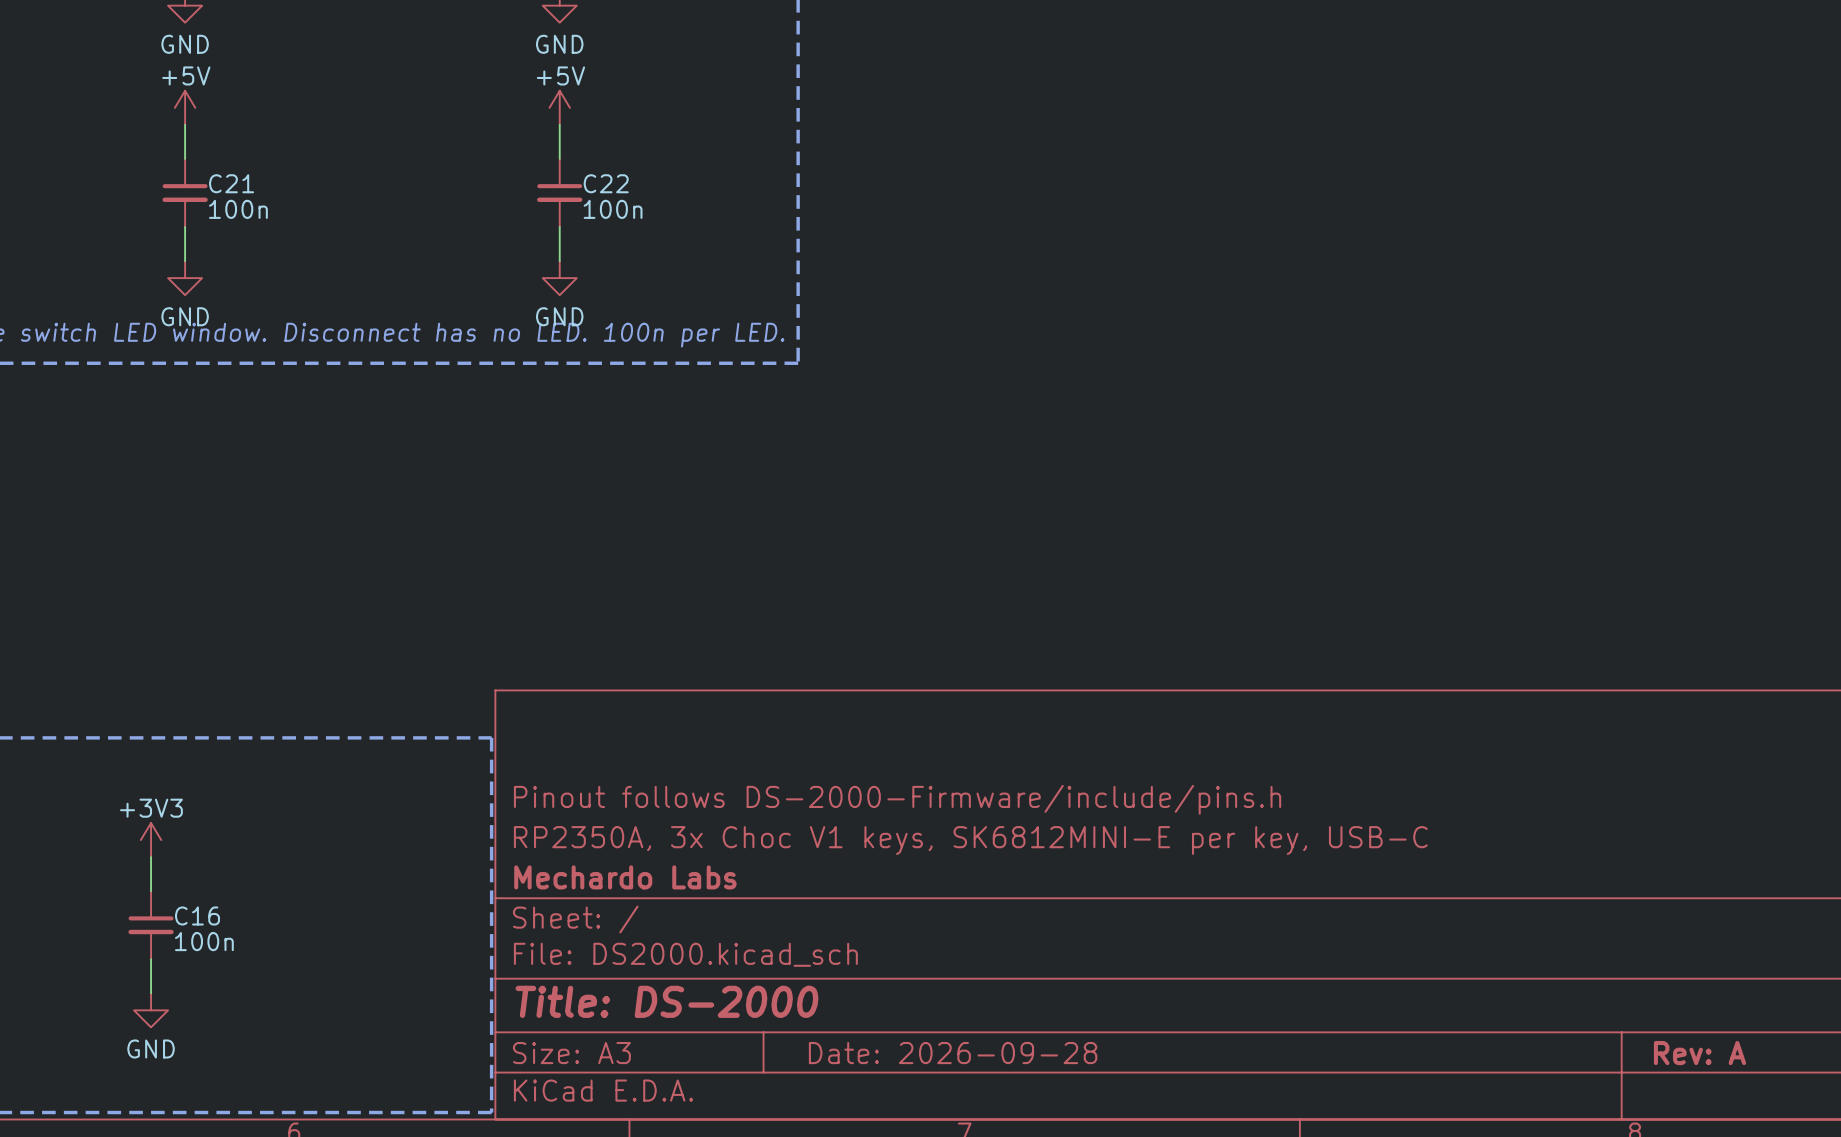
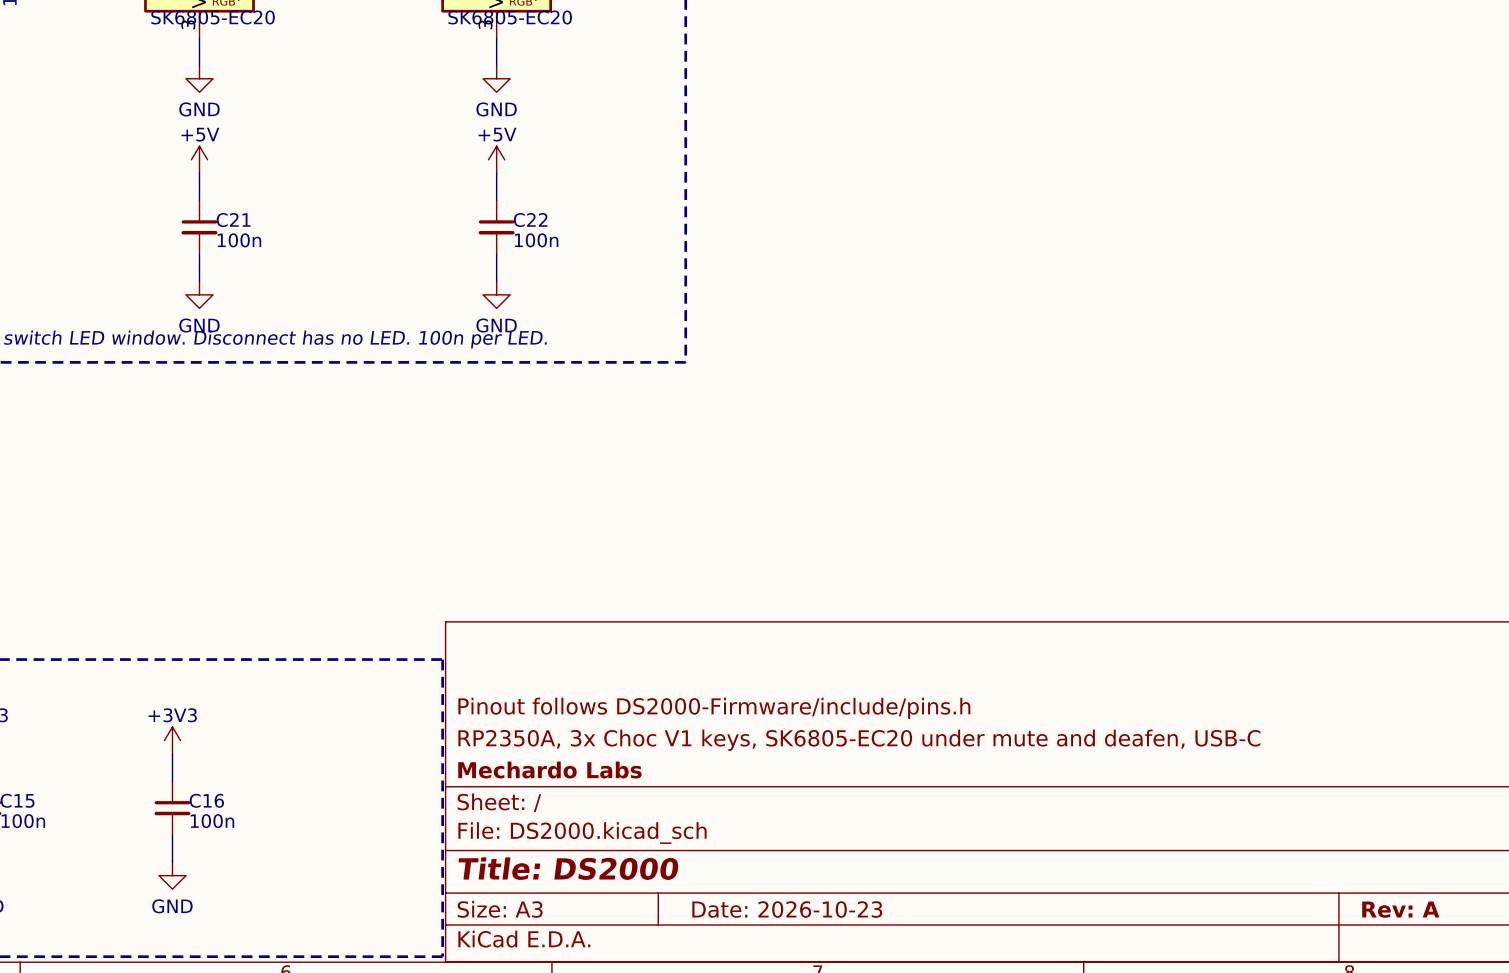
title block: Pinout follows DS-2000-Firmware/include/pins.h (897, 799) -> Pinout follows DS2000-Firmware/include/pins.h (714, 708)
title block: RP2350A, 3x Choc V1 keys, SK6812MINI-E per key, USB-C (970, 840) -> RP2350A, 3x Choc V1 keys, SK6805-EC20 under mute and deafen, USB-C (859, 740)
title block: Title: DS-2000 (666, 1001) -> Title: DS2000 (568, 868)
title block: Date: 2026-09-28 (953, 1053) -> Date: 2026-10-23 (787, 909)

